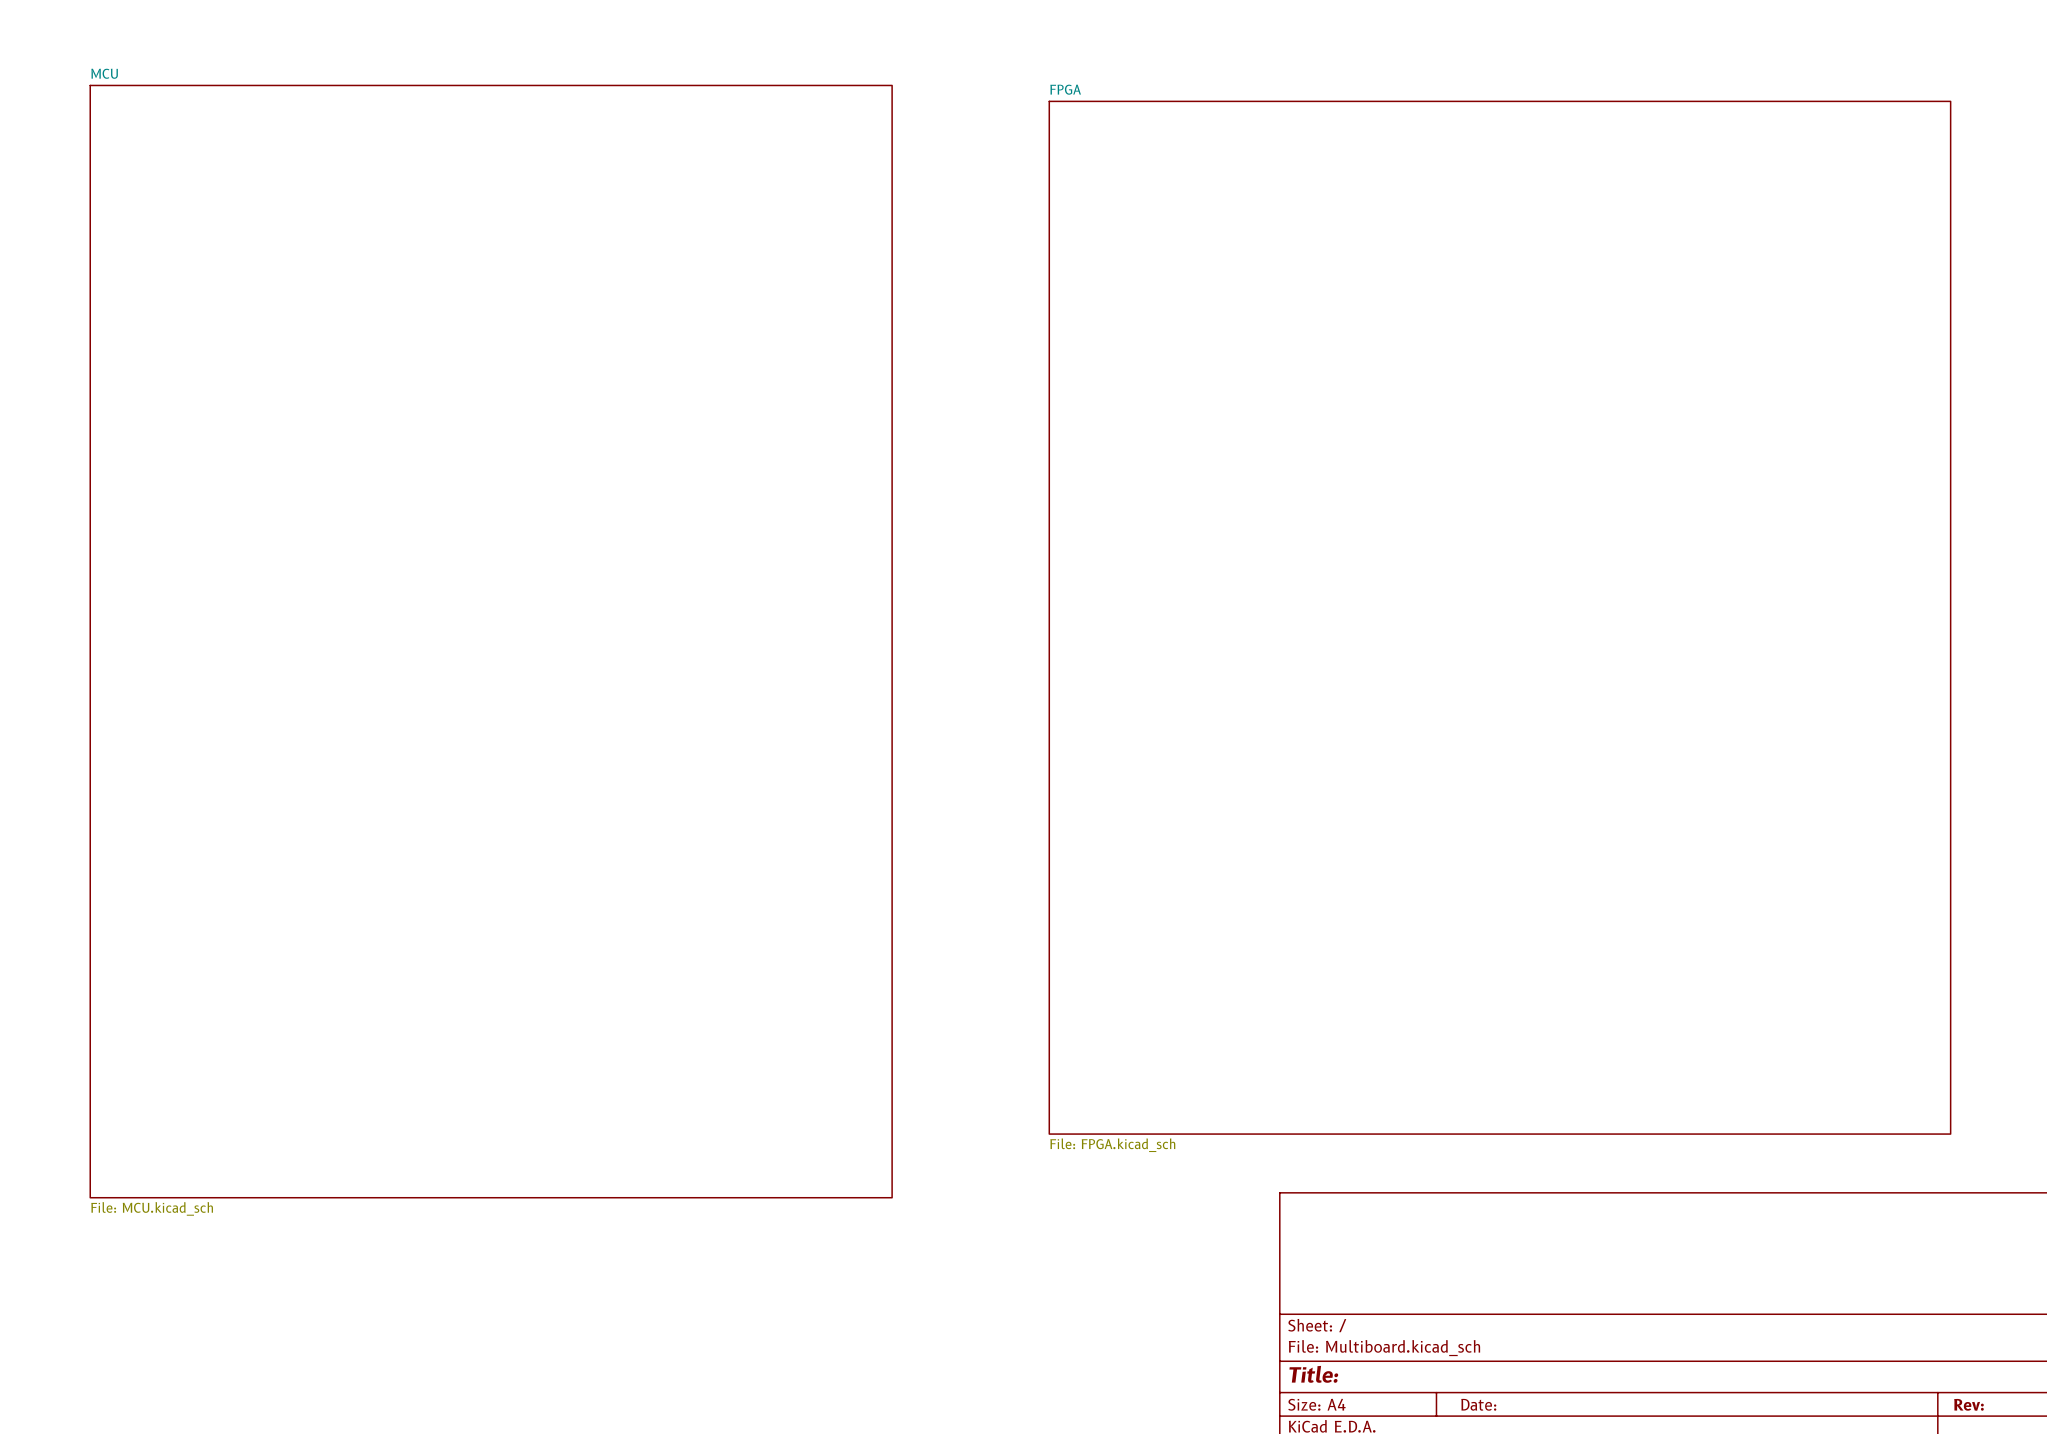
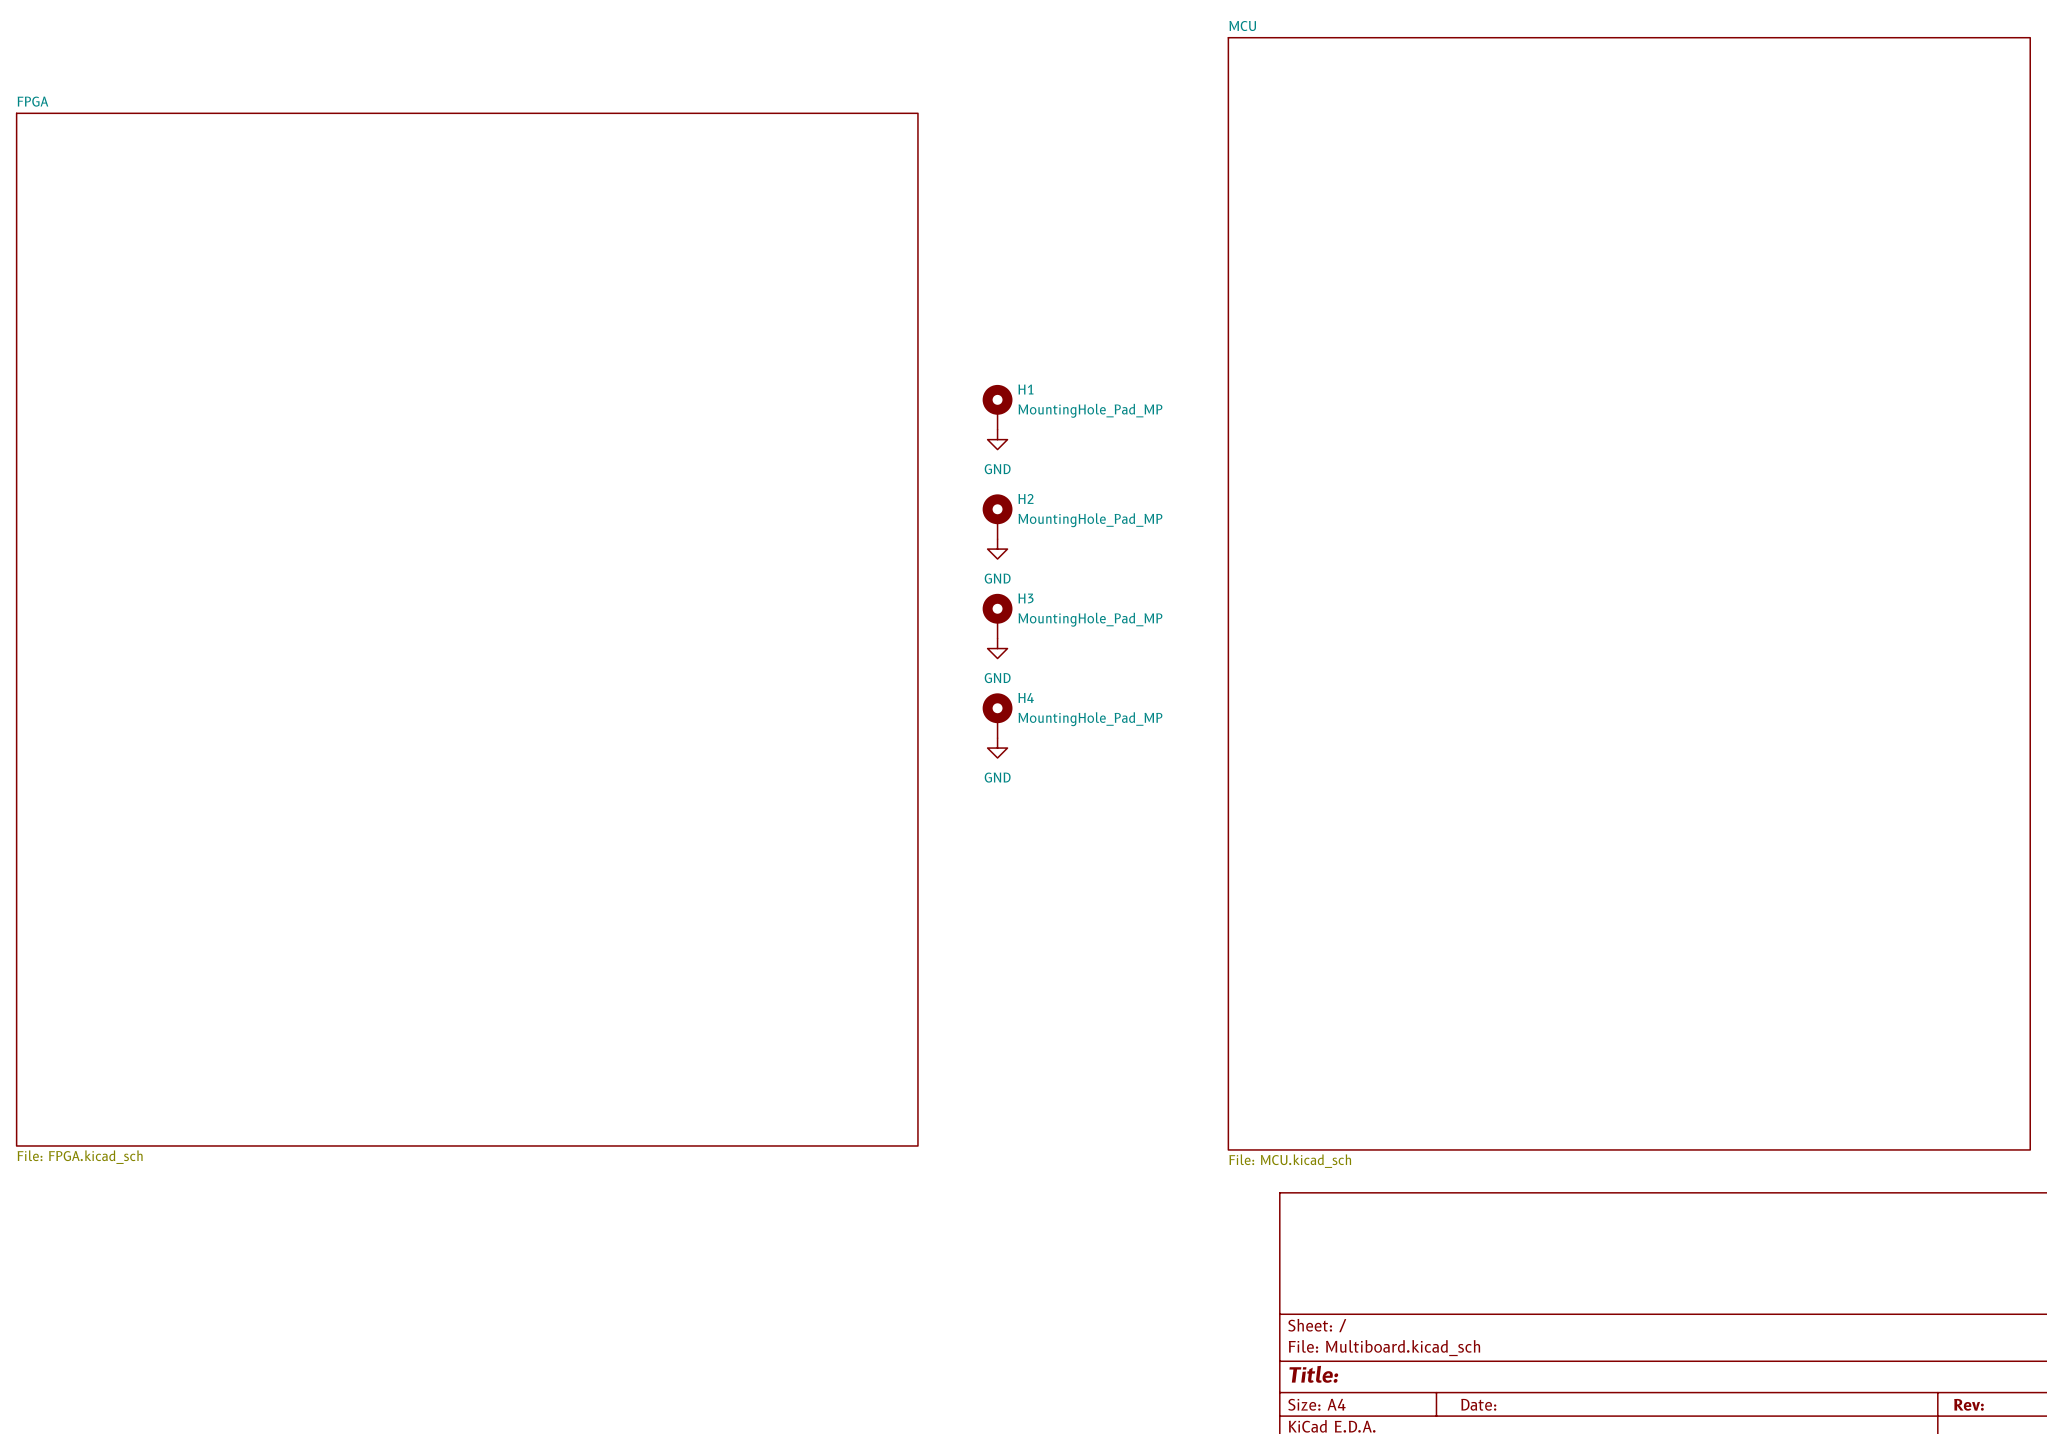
H1: none -> MountingHole_Pad_MP (997, 407)
power symbol: none -> GND (997, 439)
H2: none -> MountingHole_Pad_MP (997, 516)
power symbol: none -> GND (997, 549)
sheet MCU: none -> File: MCU.kicad_sch (1629, 593)
H3: none -> MountingHole_Pad_MP (997, 616)
sheet FPGA: File: FPGA.kicad_sch (1499, 617) -> none
sheet FPGA: none -> File: FPGA.kicad_sch (467, 629)
sheet MCU: File: MCU.kicad_sch (491, 641) -> none
power symbol: none -> GND (997, 648)
H4: none -> MountingHole_Pad_MP (997, 715)
power symbol: none -> GND (997, 748)

